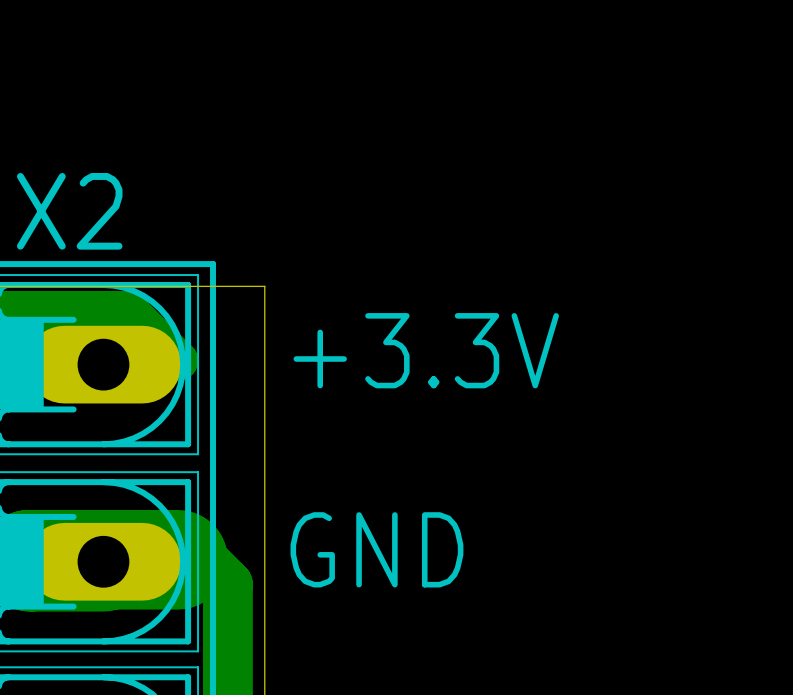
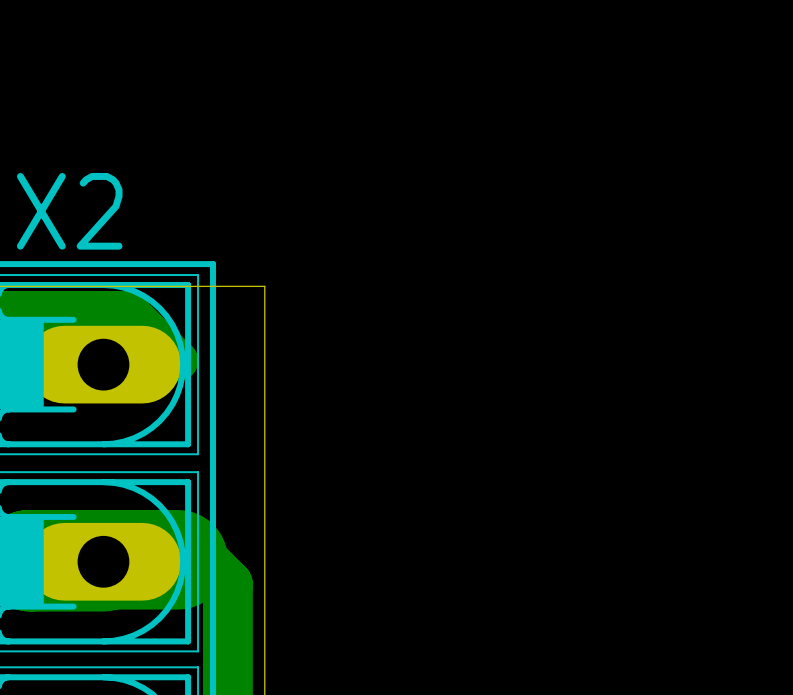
text: +3.3V (426, 350) -> none
text: GND (376, 549) -> none

